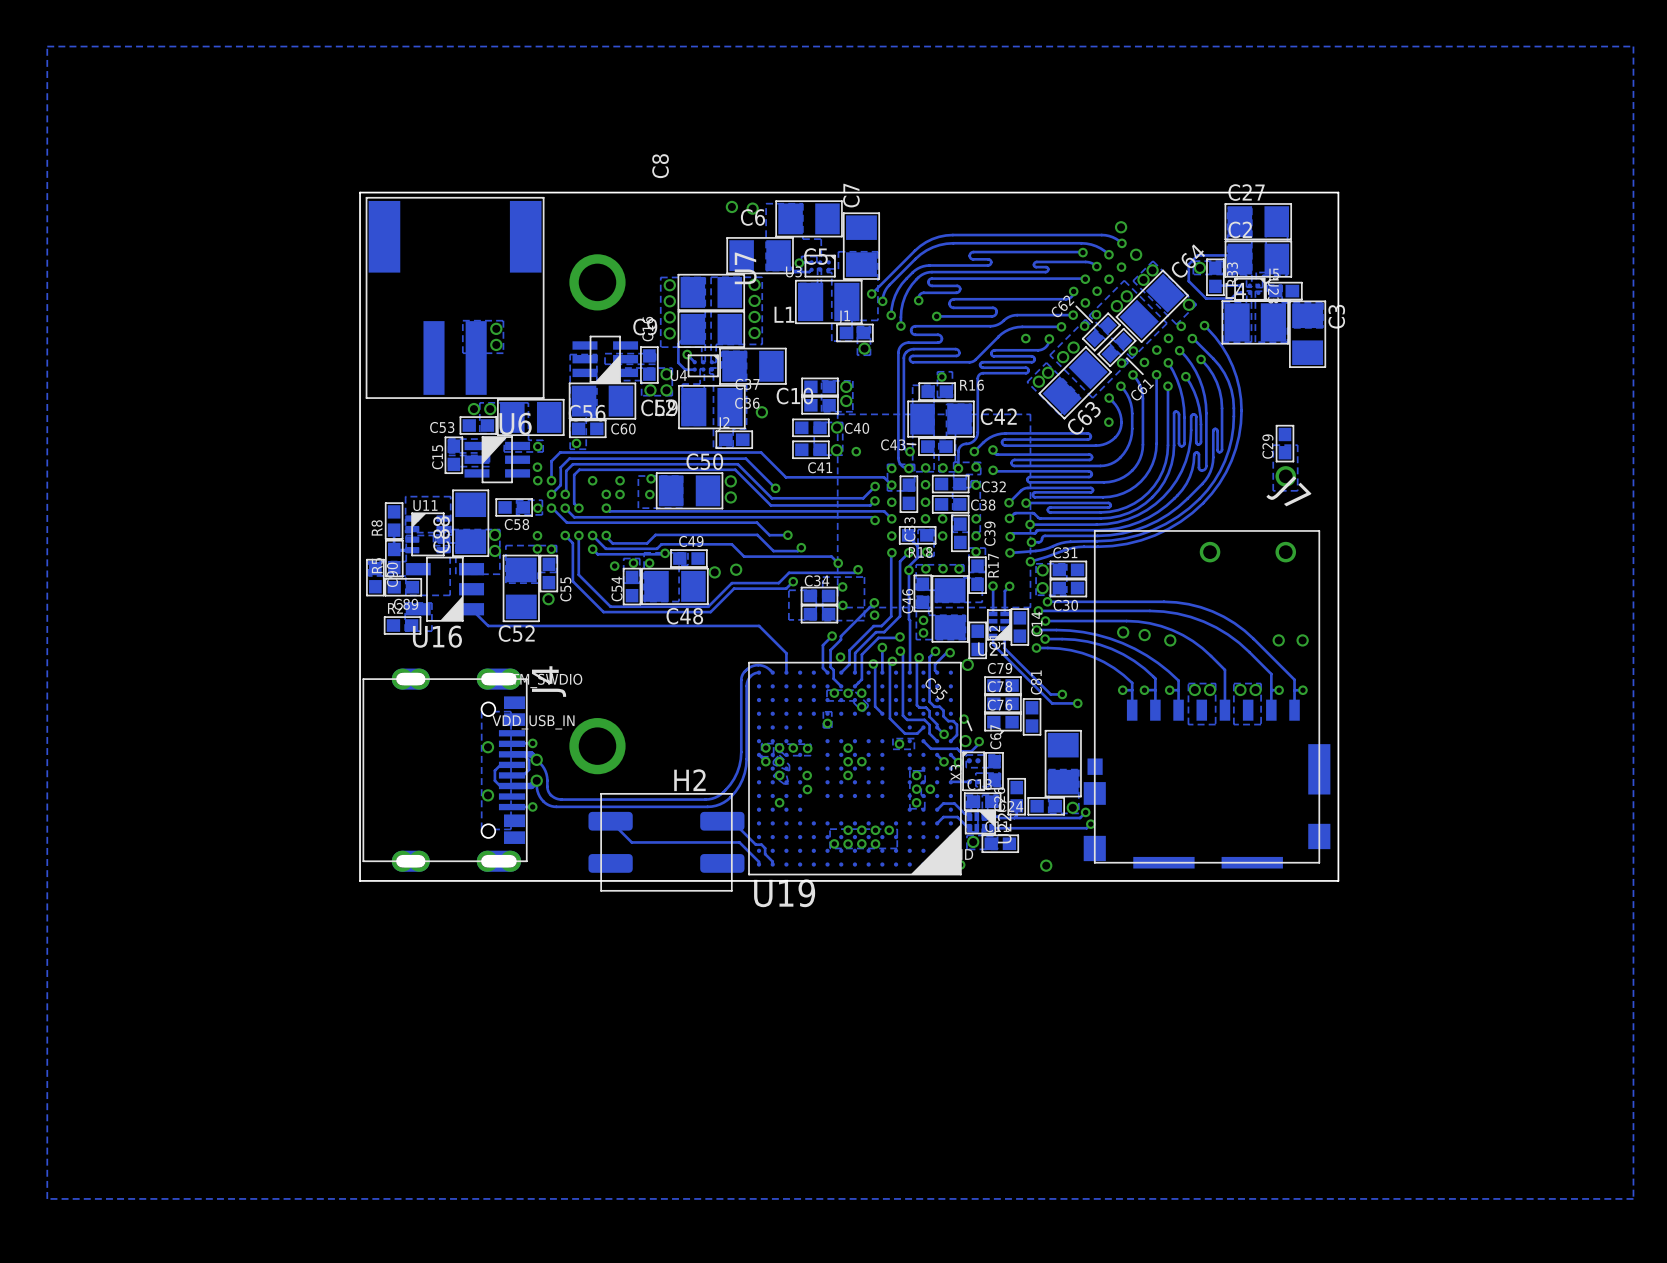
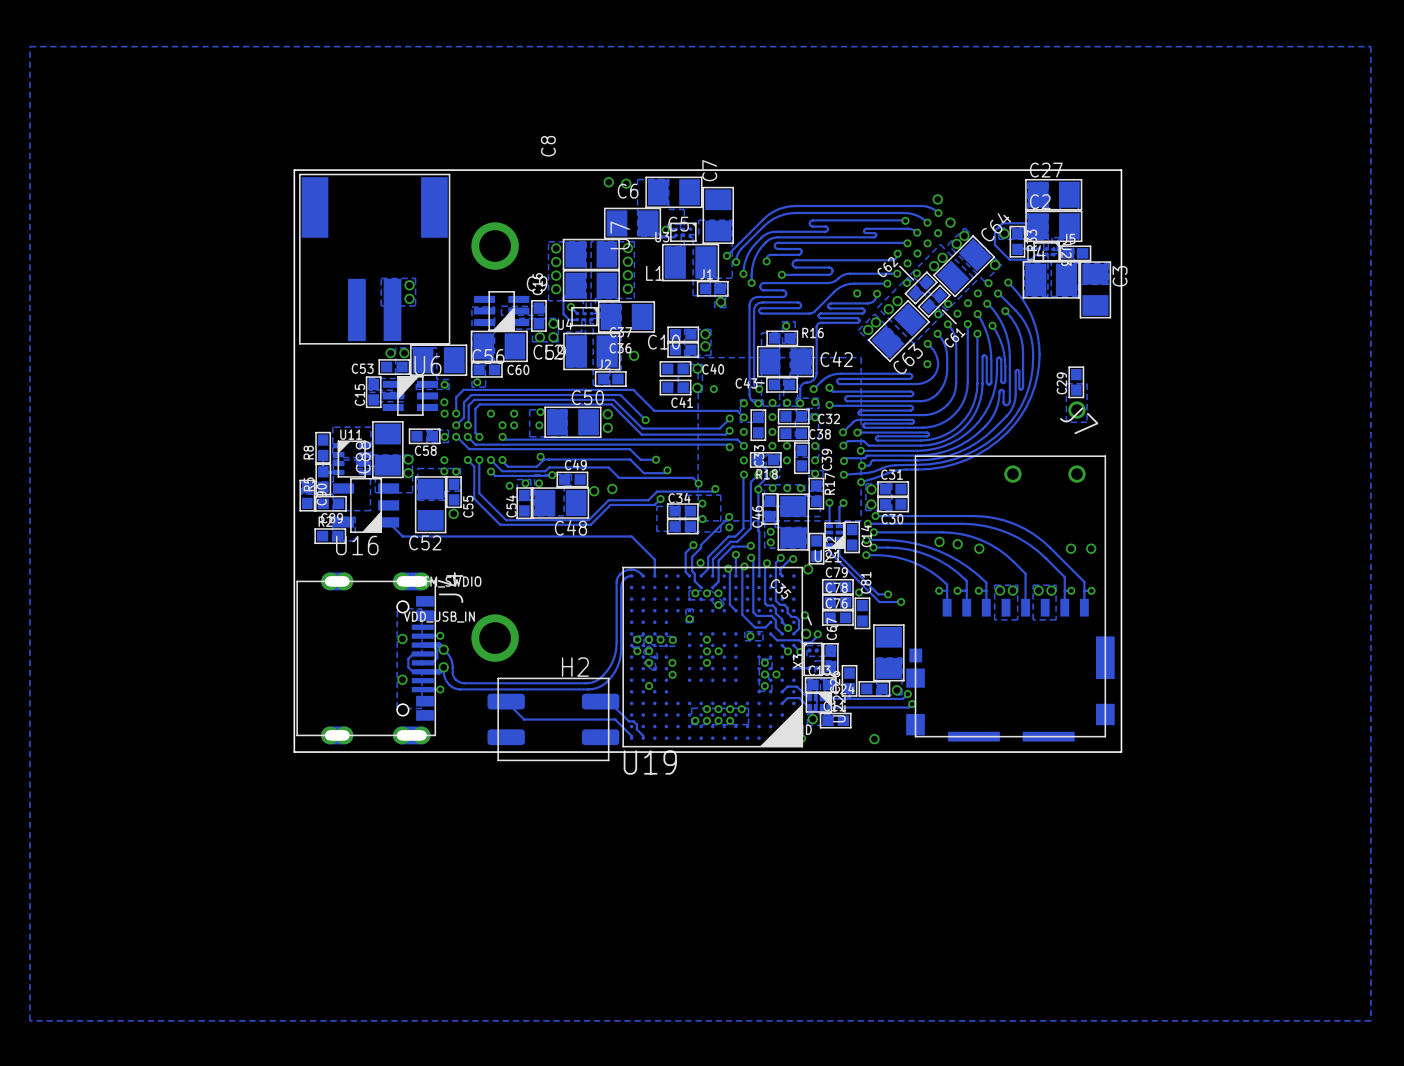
via: none -> (540, 456)
via: none -> (859, 592)

